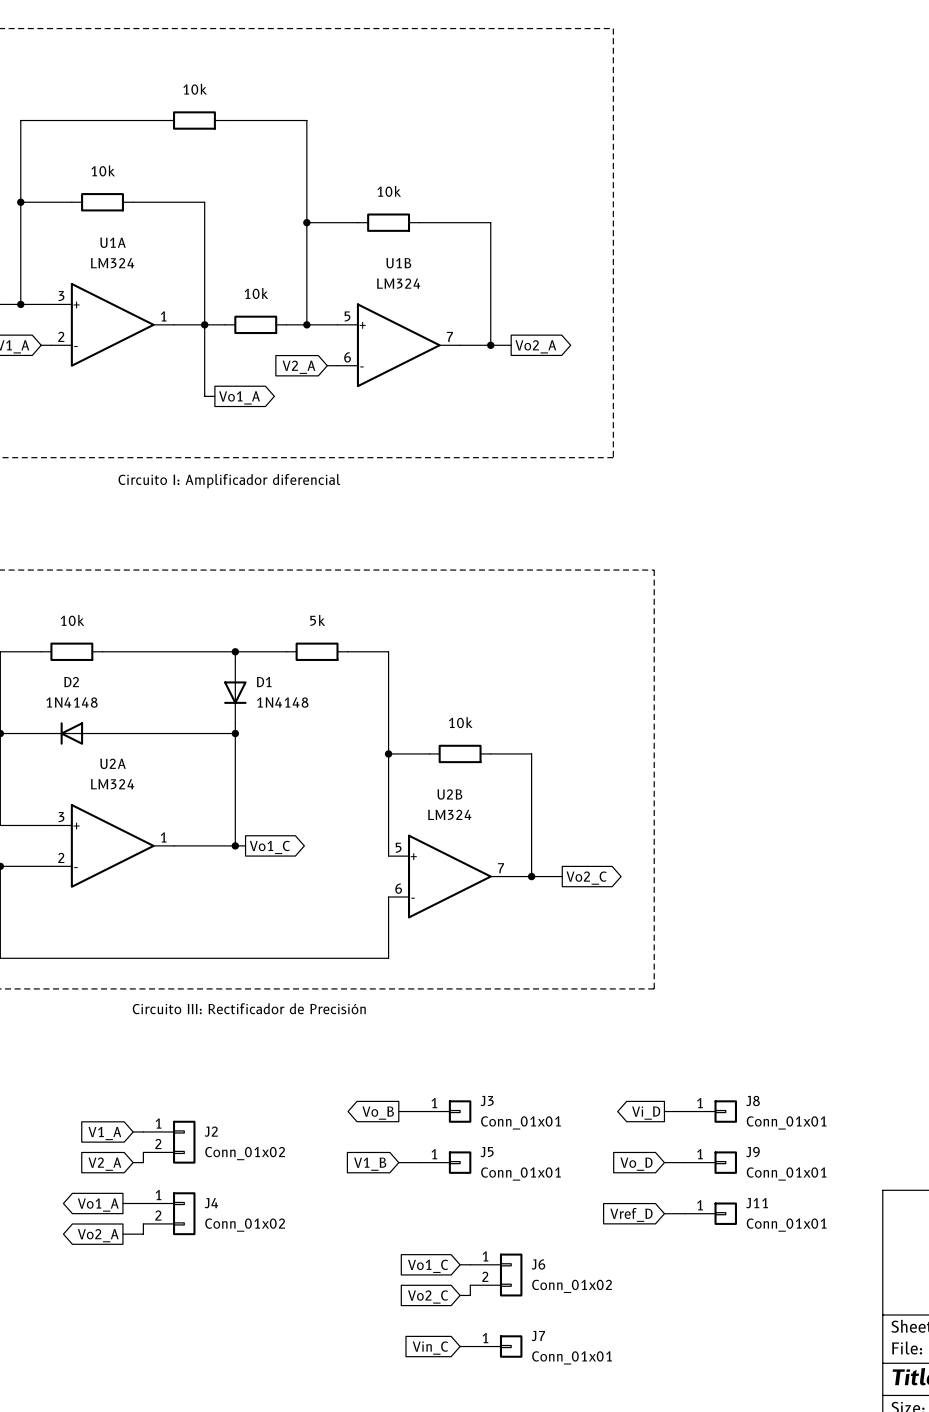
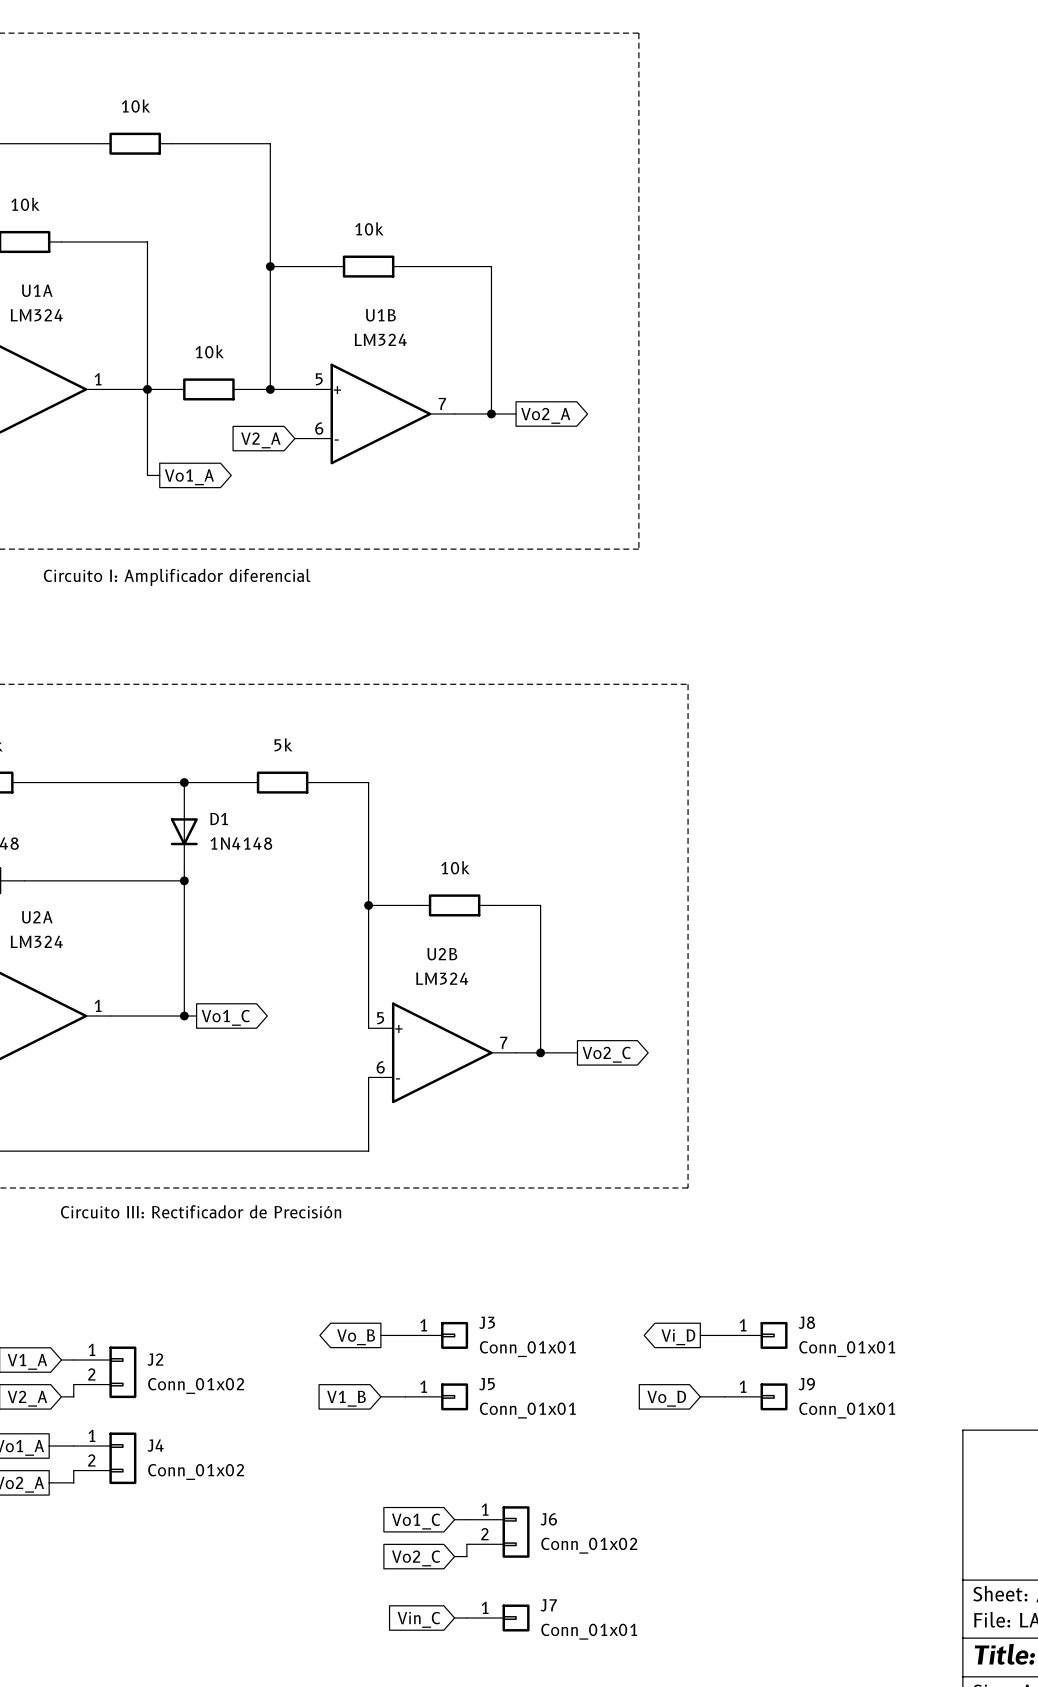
wire: (664, 1213) (684, 1213) -> none
J11: Conn_01x01 (710, 1213) -> none
global label: Vref_D (631, 1214) -> none

